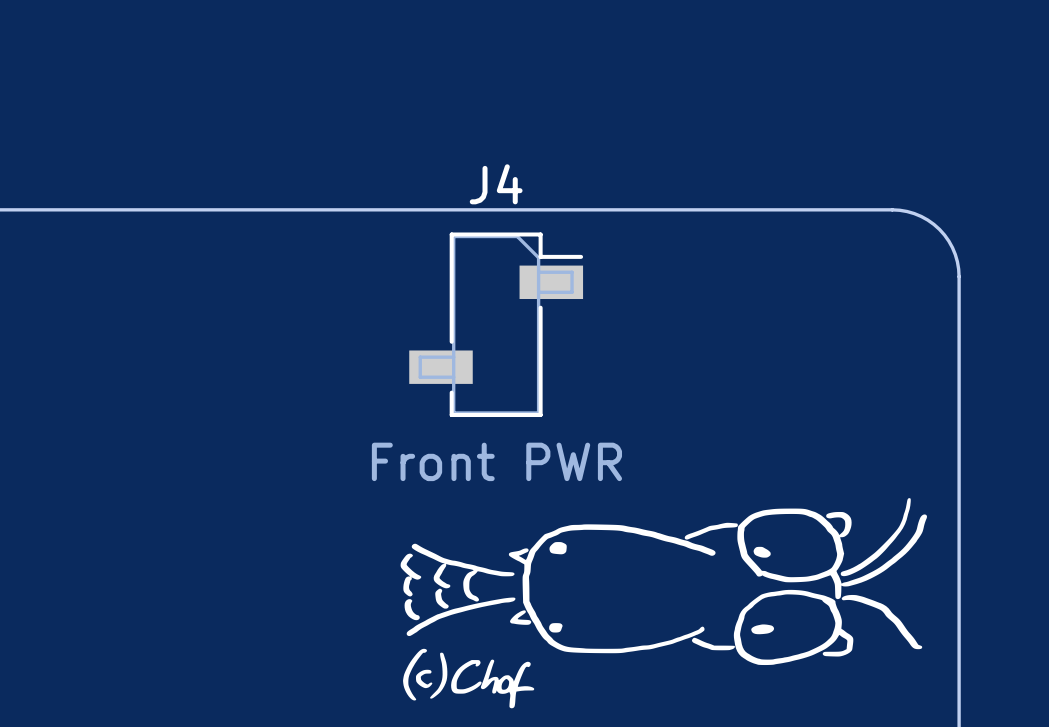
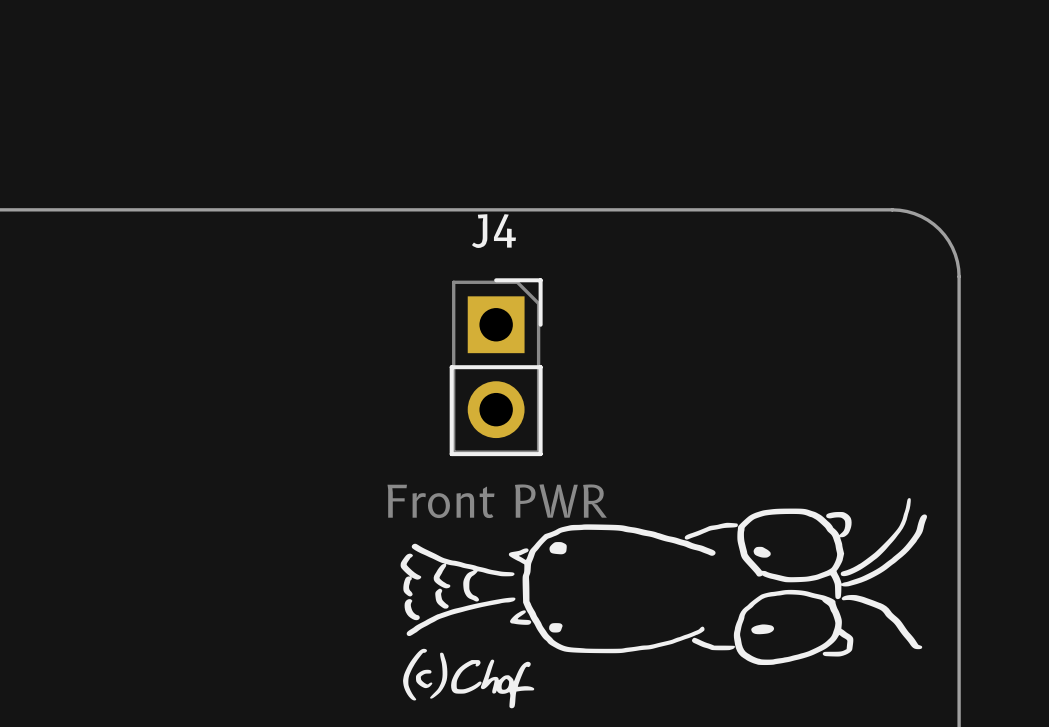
J4 footprint: [409, 232, 584, 418] -> [449, 278, 543, 457]

